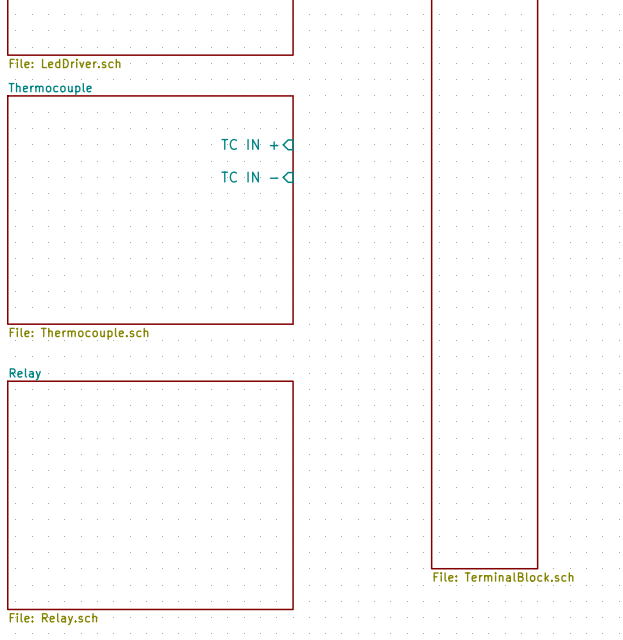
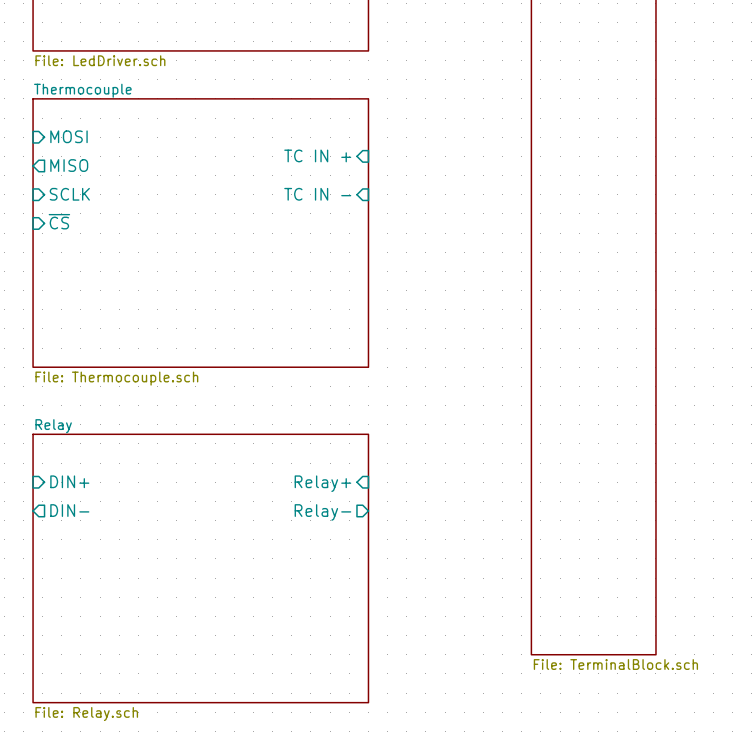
sheet pin: none -> MOSI (68, 136)
sheet pin: none -> MISO (69, 165)
sheet pin: none -> SCLK (69, 194)
sheet pin: none -> ~{CS} (59, 221)
sheet pin: none -> DIN+ (69, 481)
sheet pin: none -> Relay+ (322, 483)
sheet pin: none -> DIN- (69, 510)
sheet pin: none -> Relay- (322, 512)

